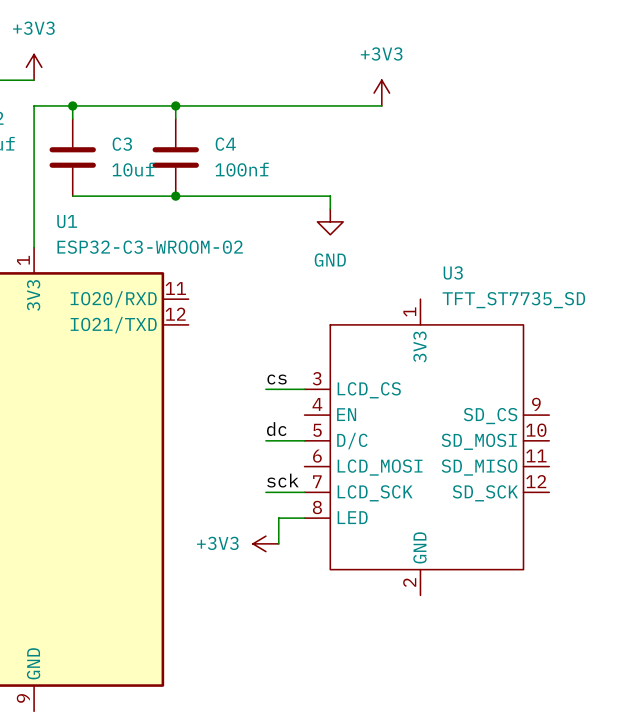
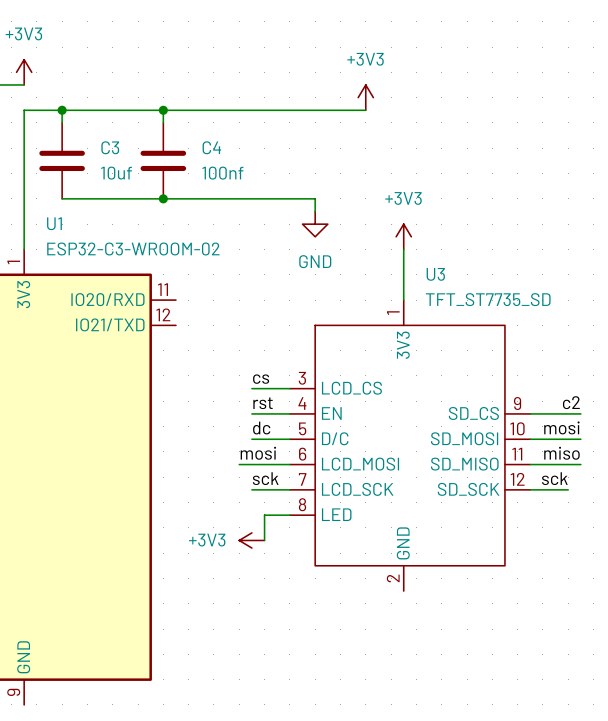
power symbol: none -> +3V3 (403, 236)
wire: none -> (403, 249) (403, 300)
label: none -> rst (263, 403)
label: none -> c2 (571, 402)
wire: none -> (251, 413) (289, 413)
wire: none -> (530, 413) (580, 413)
label: none -> mosi (561, 427)
wire: none -> (530, 439) (580, 439)
label: none -> mosi (258, 453)
label: none -> miso (561, 453)
wire: none -> (239, 464) (289, 464)
wire: none -> (530, 464) (580, 464)
label: none -> sck (554, 478)
wire: none -> (530, 489) (568, 489)

